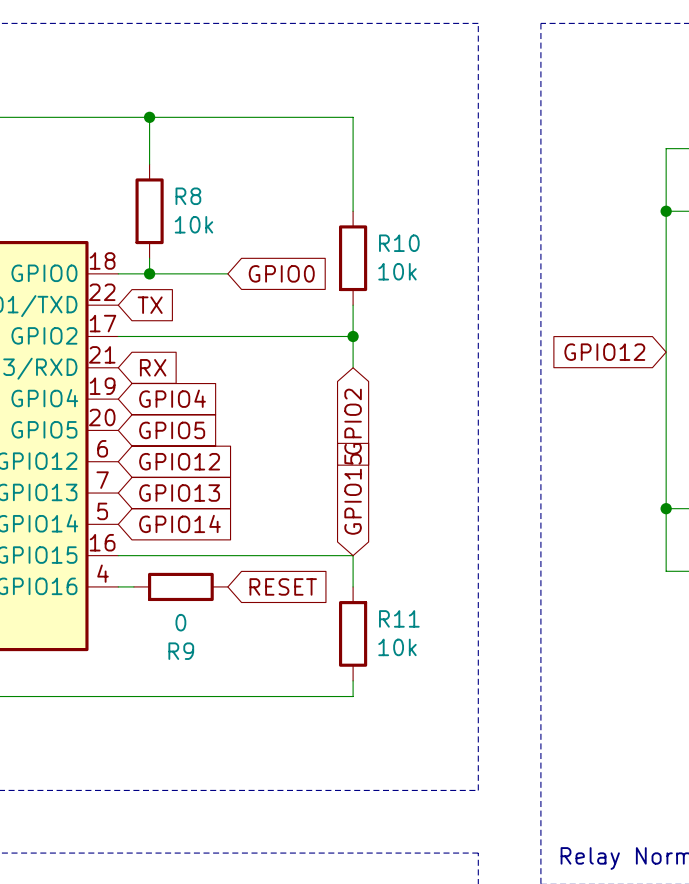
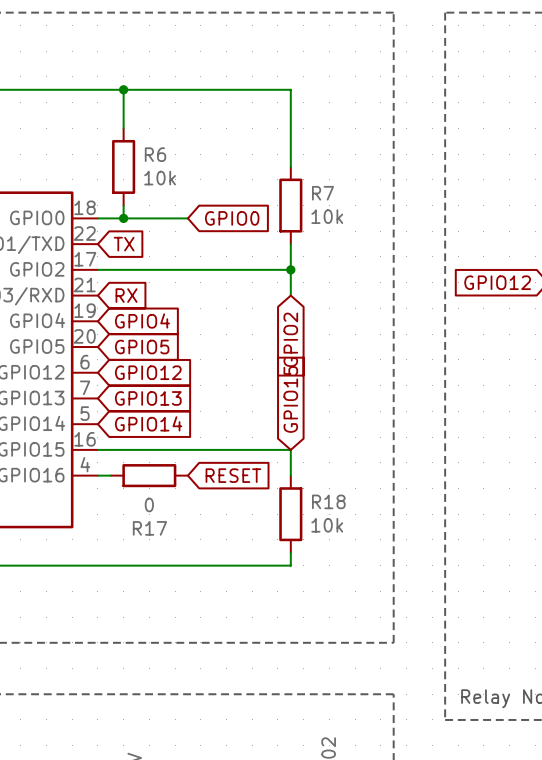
R8 name: R8 (188, 196) -> R6 (155, 154)
R10 name: R10 (399, 243) -> R7 (323, 193)
R11 name: R11 (399, 618) -> R18 (328, 501)
R9 name: R9 (181, 651) -> R17 (149, 528)

